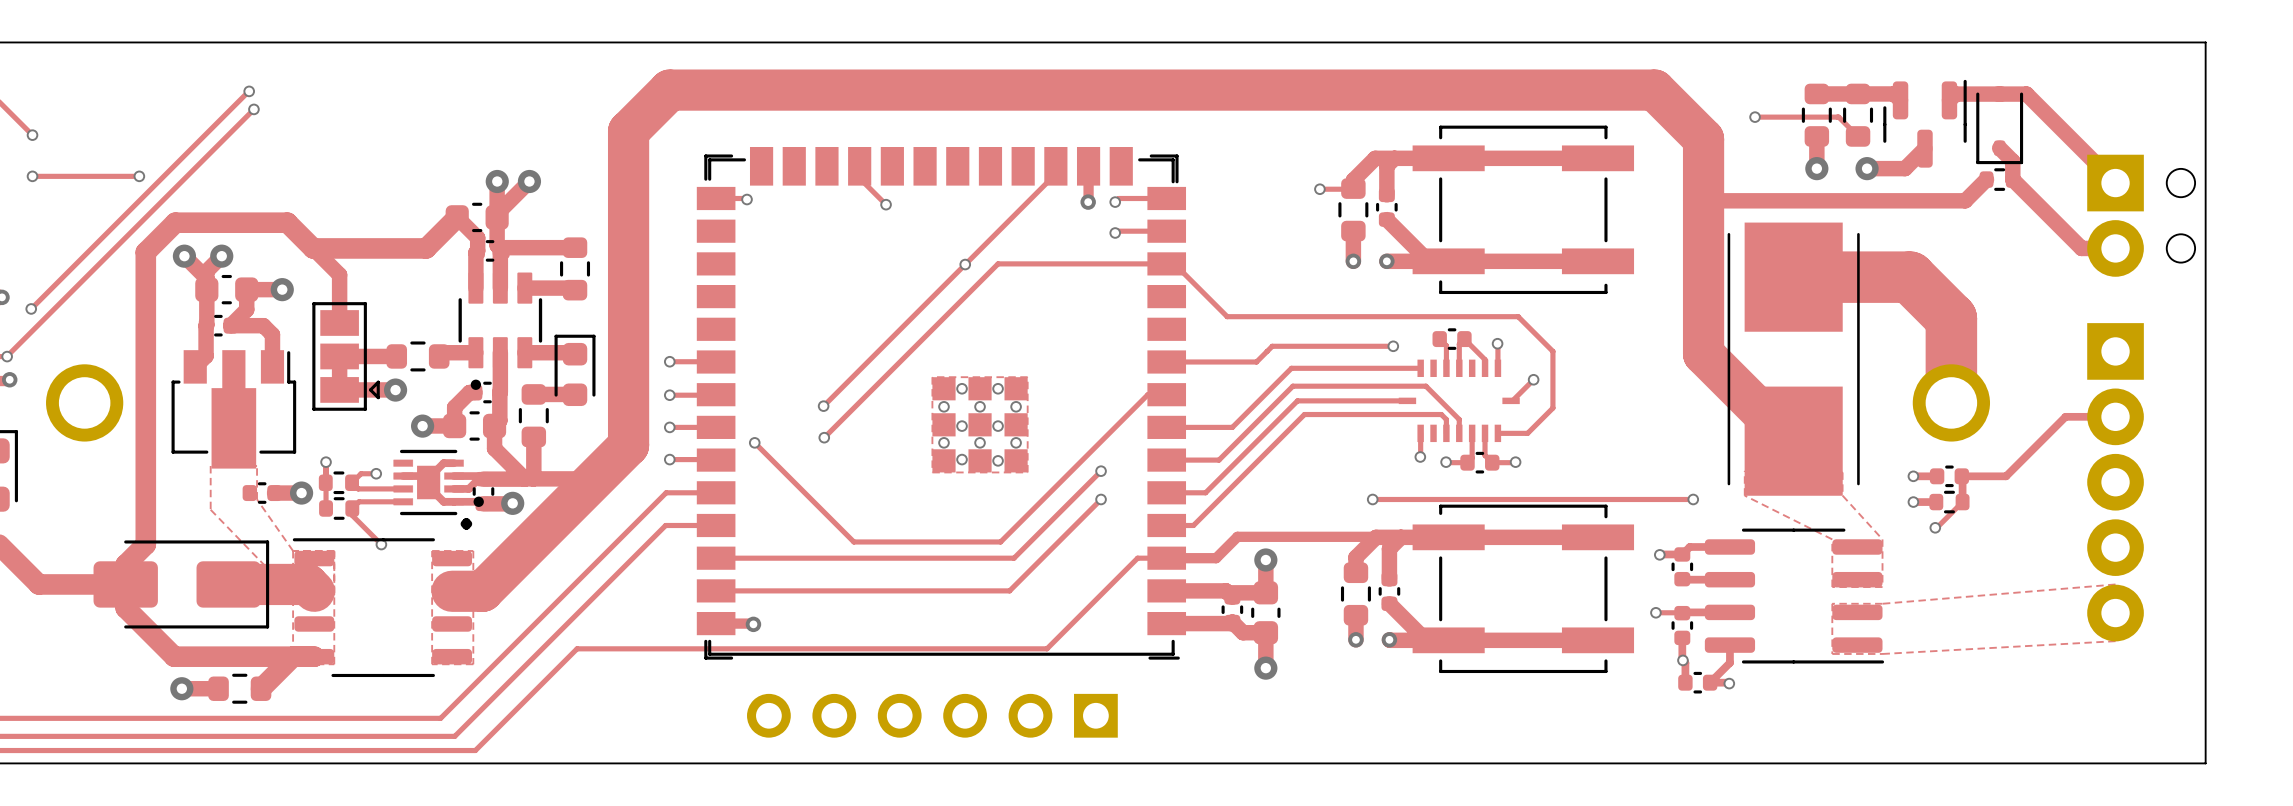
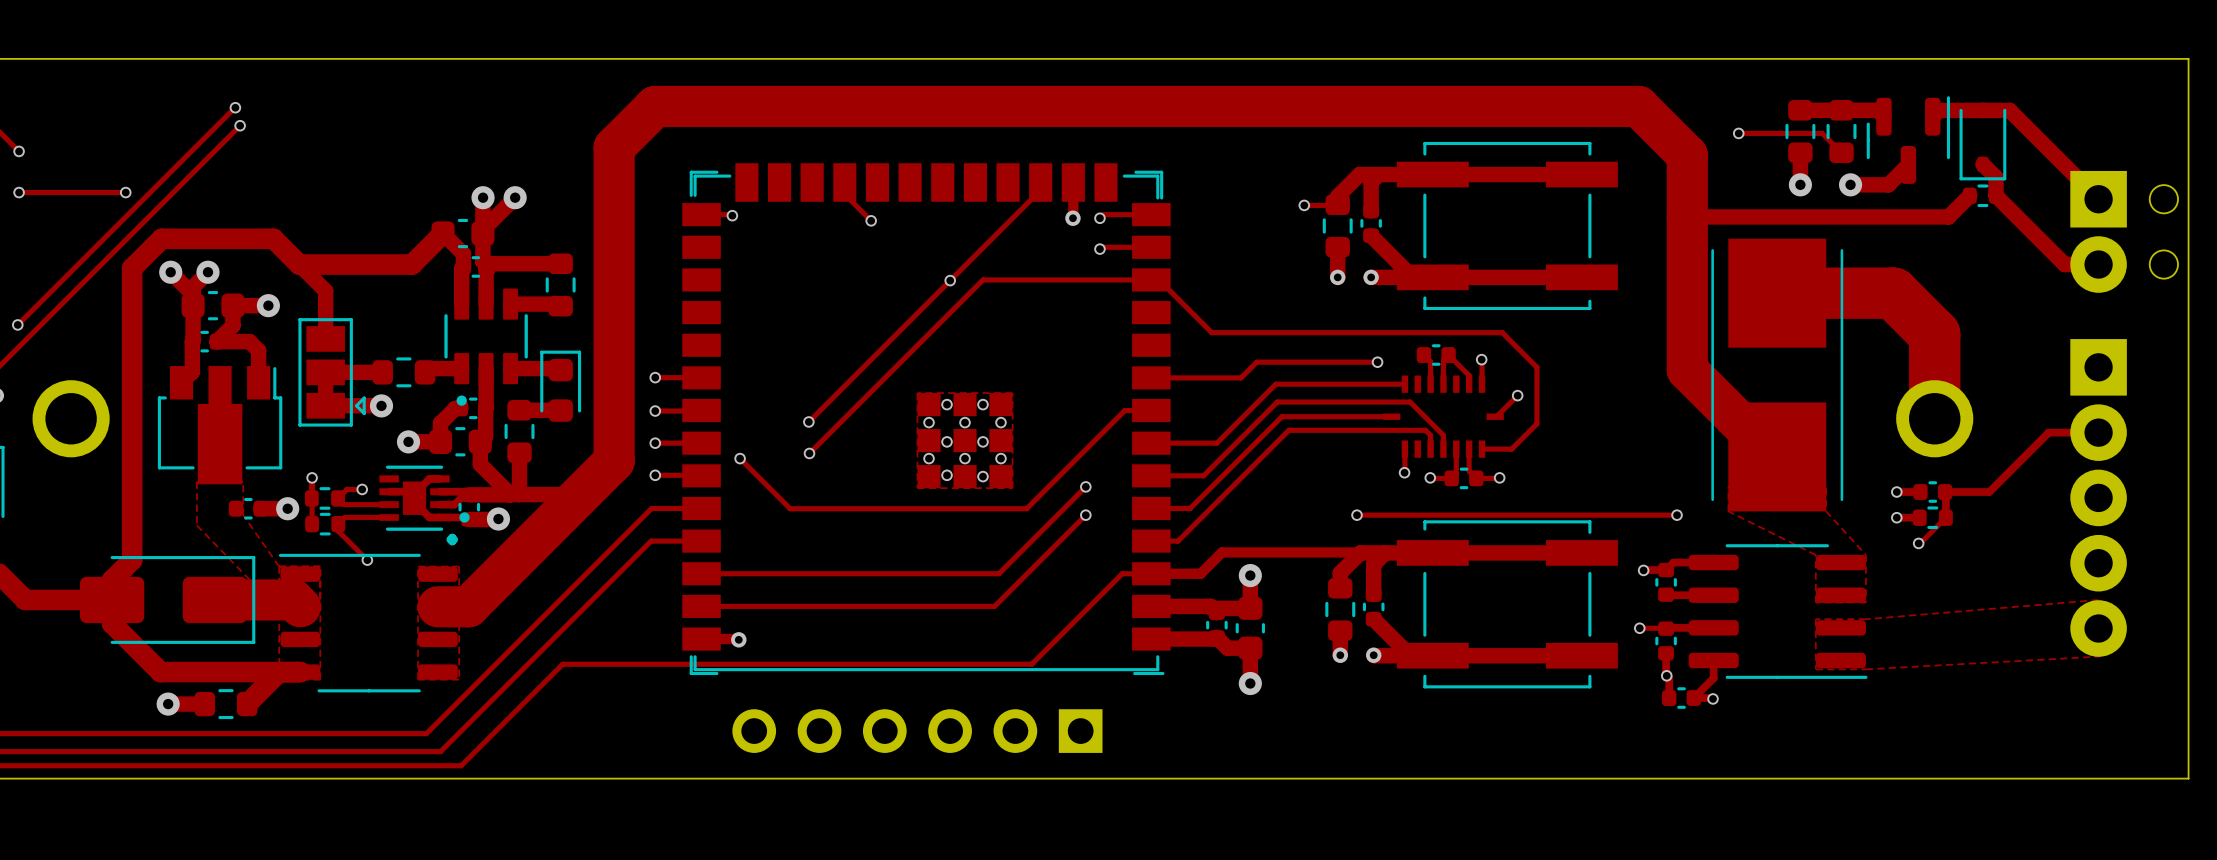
track: (1147, 394) (1000, 541) (853, 541) (804, 493) -> (1132, 410) (1124, 410) (1026, 508) (790, 508)

